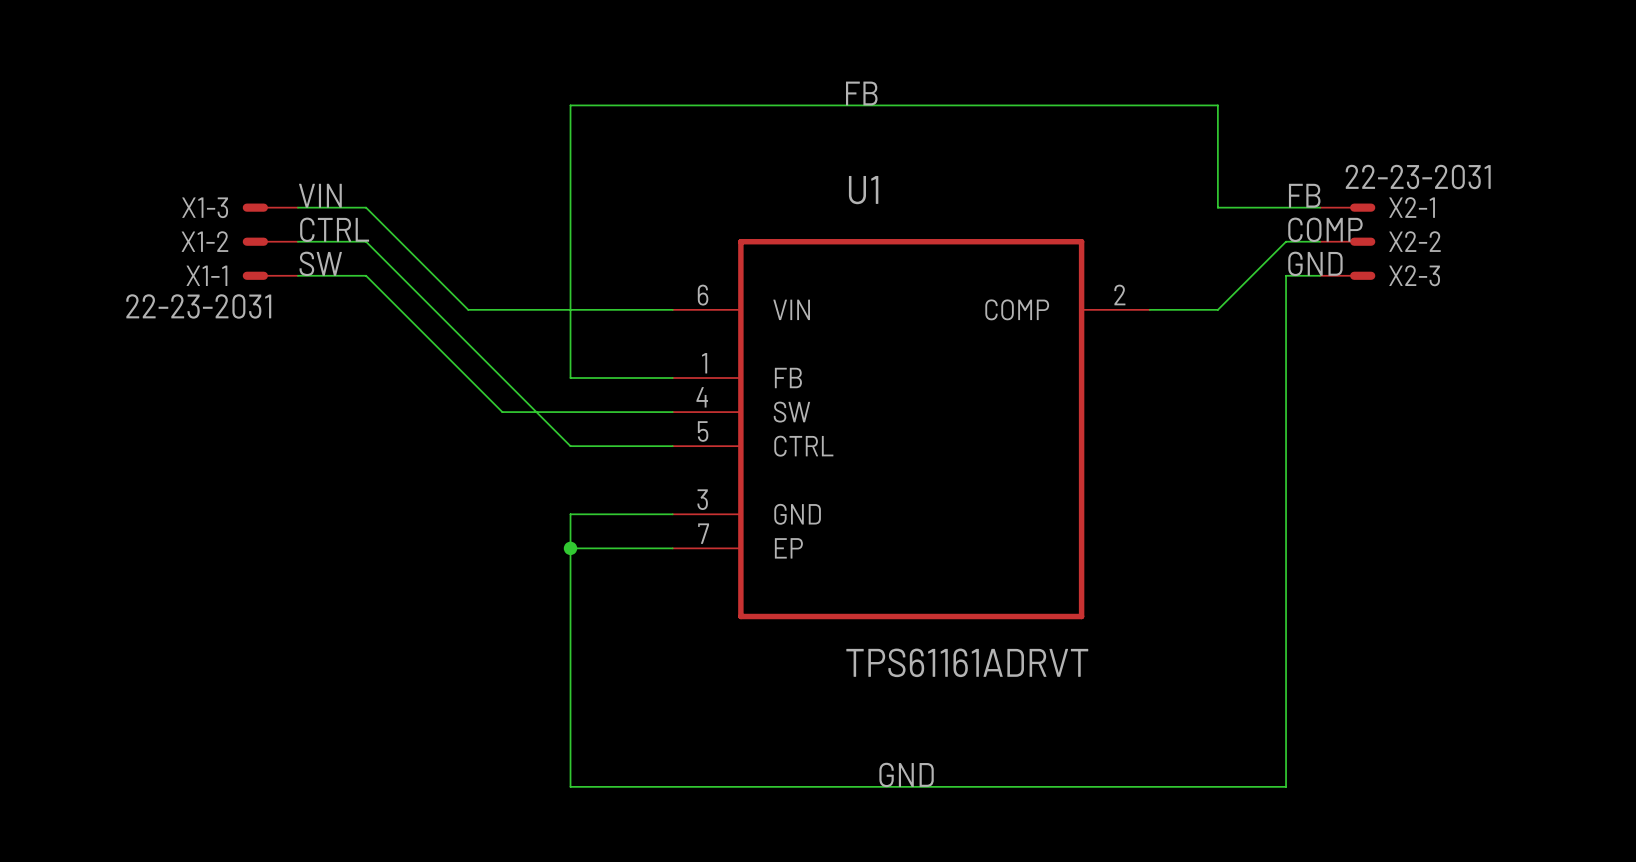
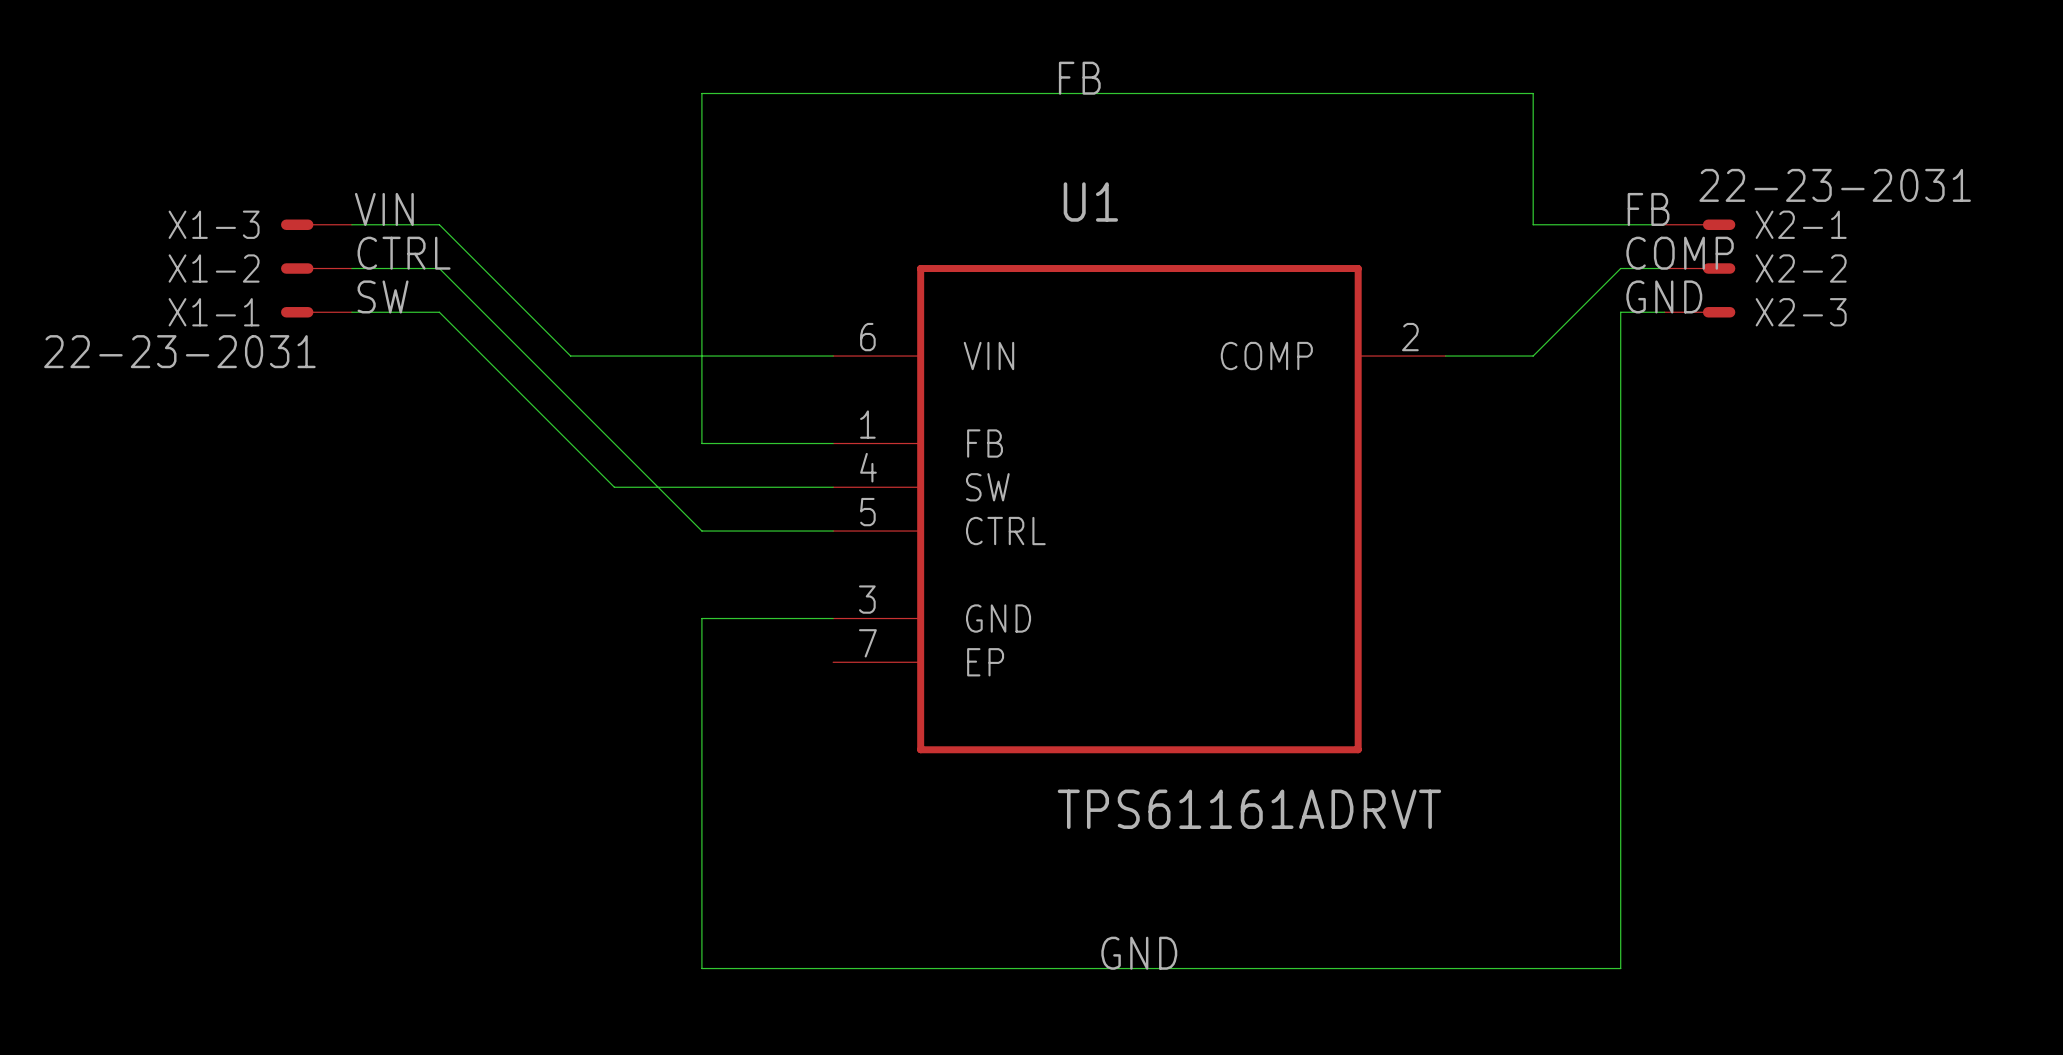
wire: (570, 548) (672, 548) -> none
junction: (570, 548) -> none

